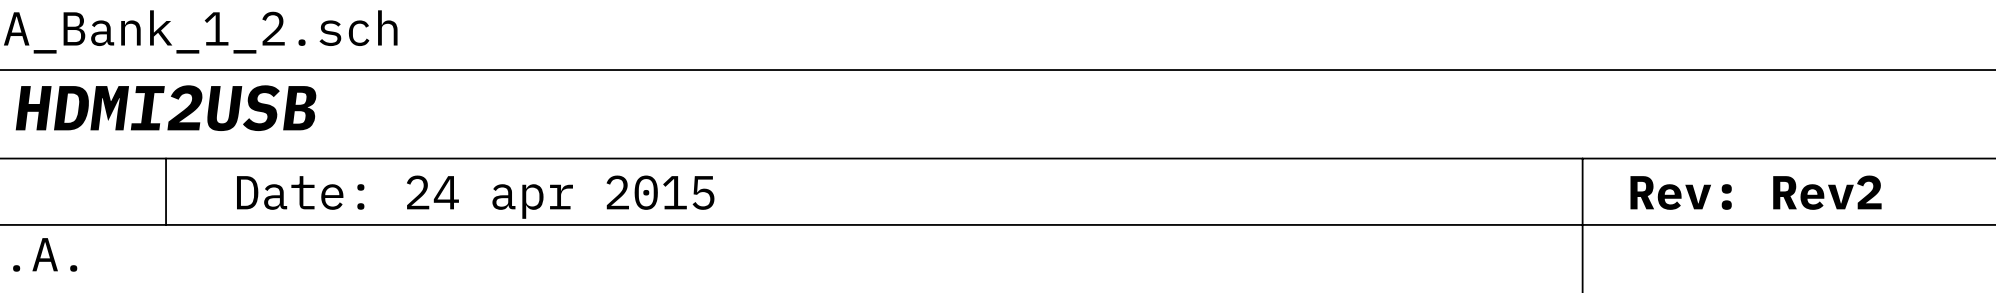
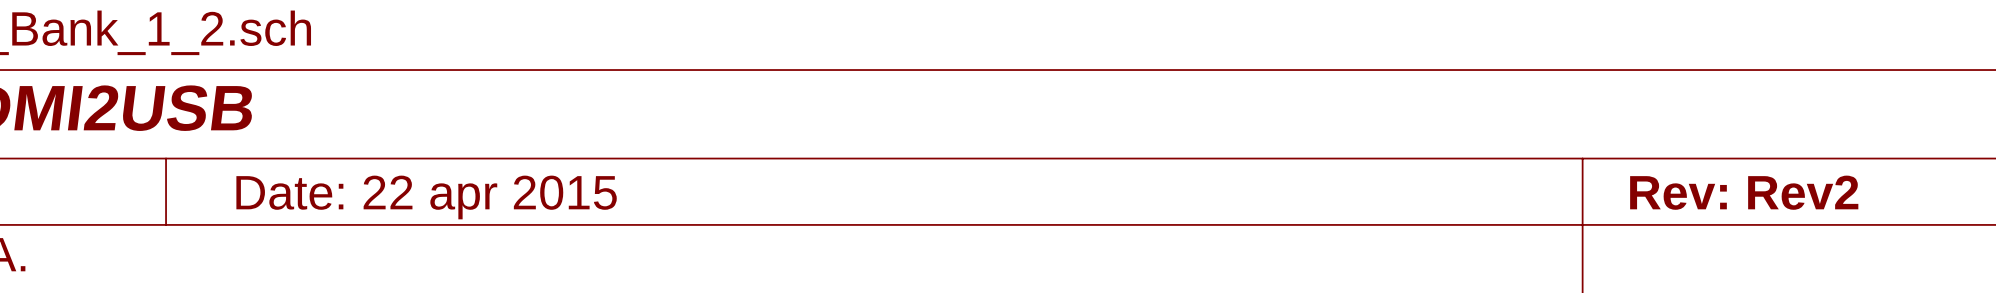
title block: Date: 24 apr 2015 (475, 197) -> Date: 22 apr 2015 (426, 197)

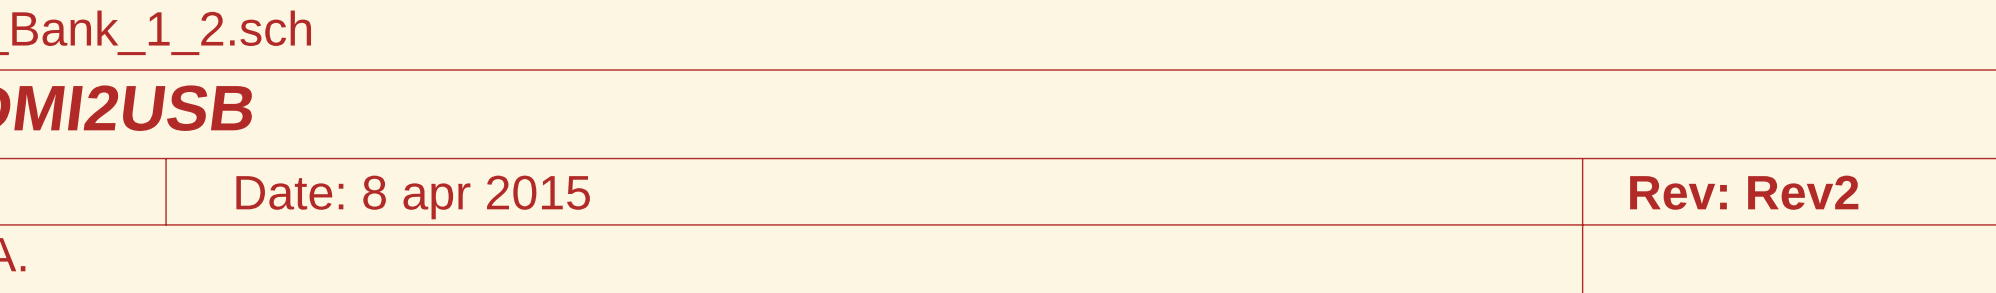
title block: Date: 22 apr 2015 (426, 197) -> Date: 8 apr 2015 (413, 197)

